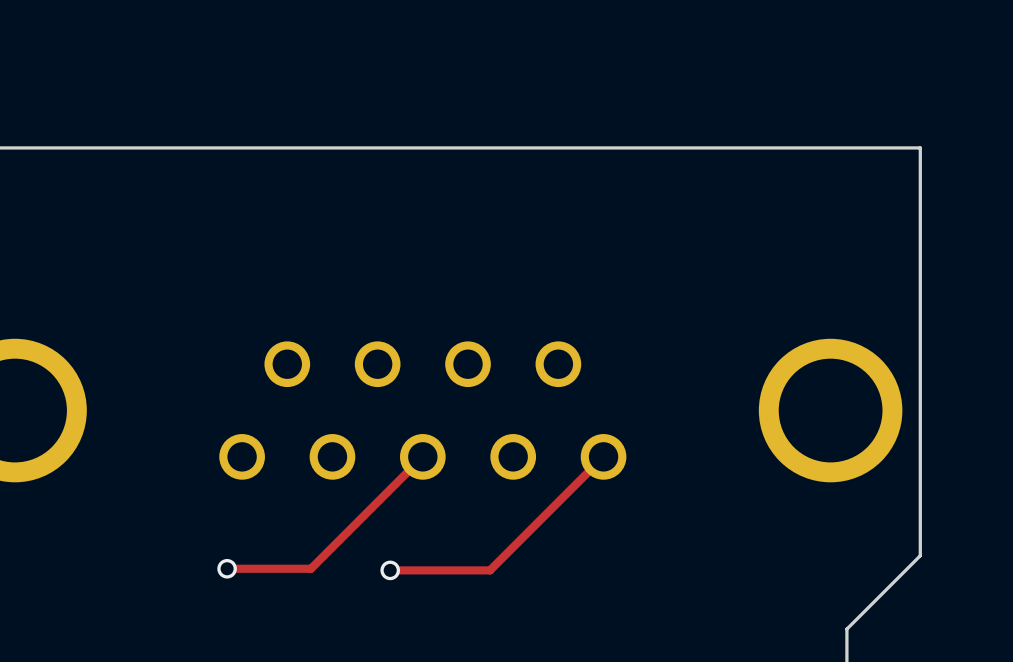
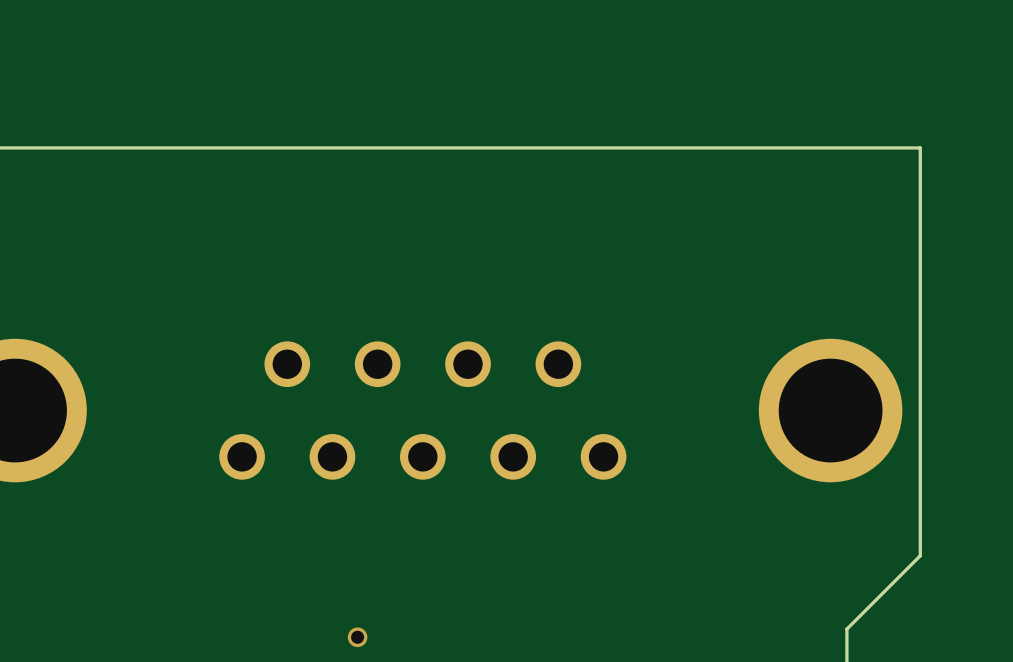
track: (422, 456) (310, 568) (227, 568) -> none
track: (603, 456) (490, 570) (390, 570) -> none
via: (227, 568) -> none
via: (390, 570) -> none
via: none -> (357, 637)

